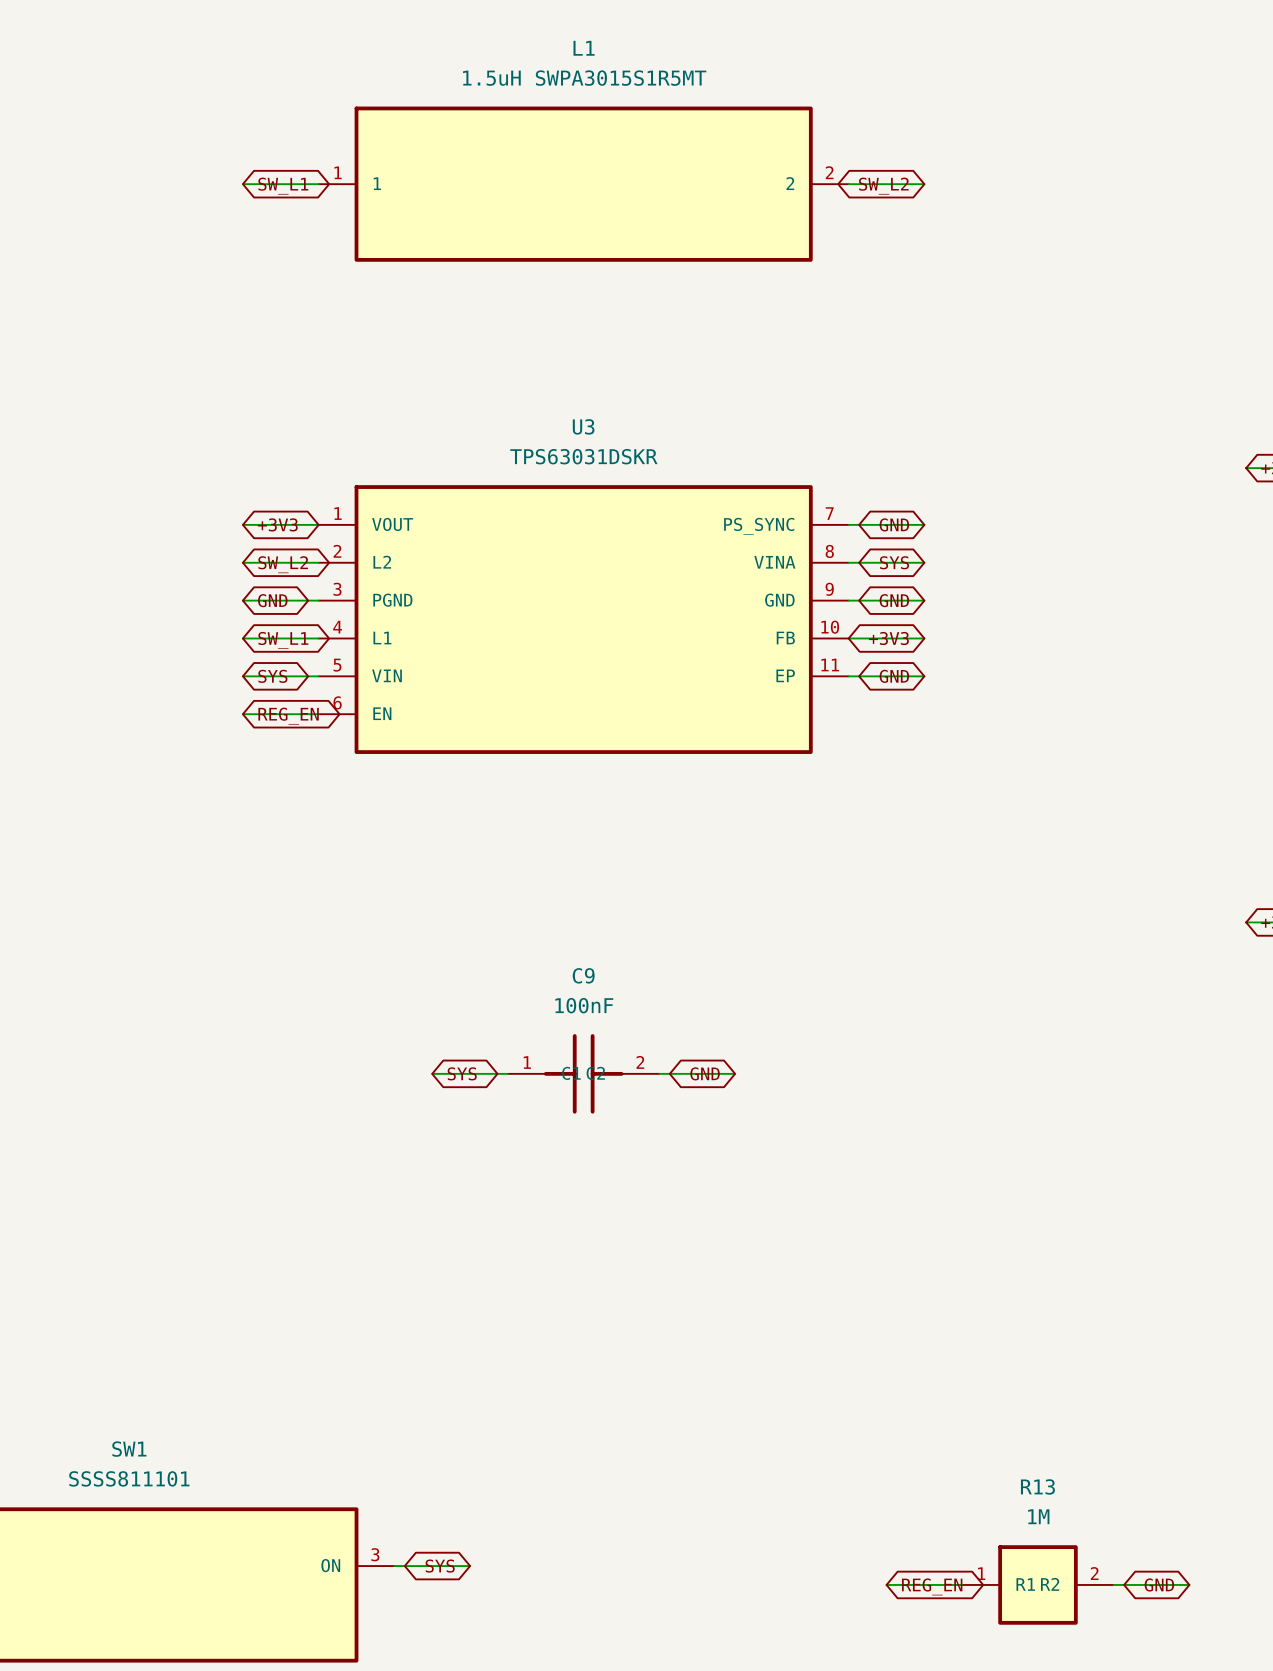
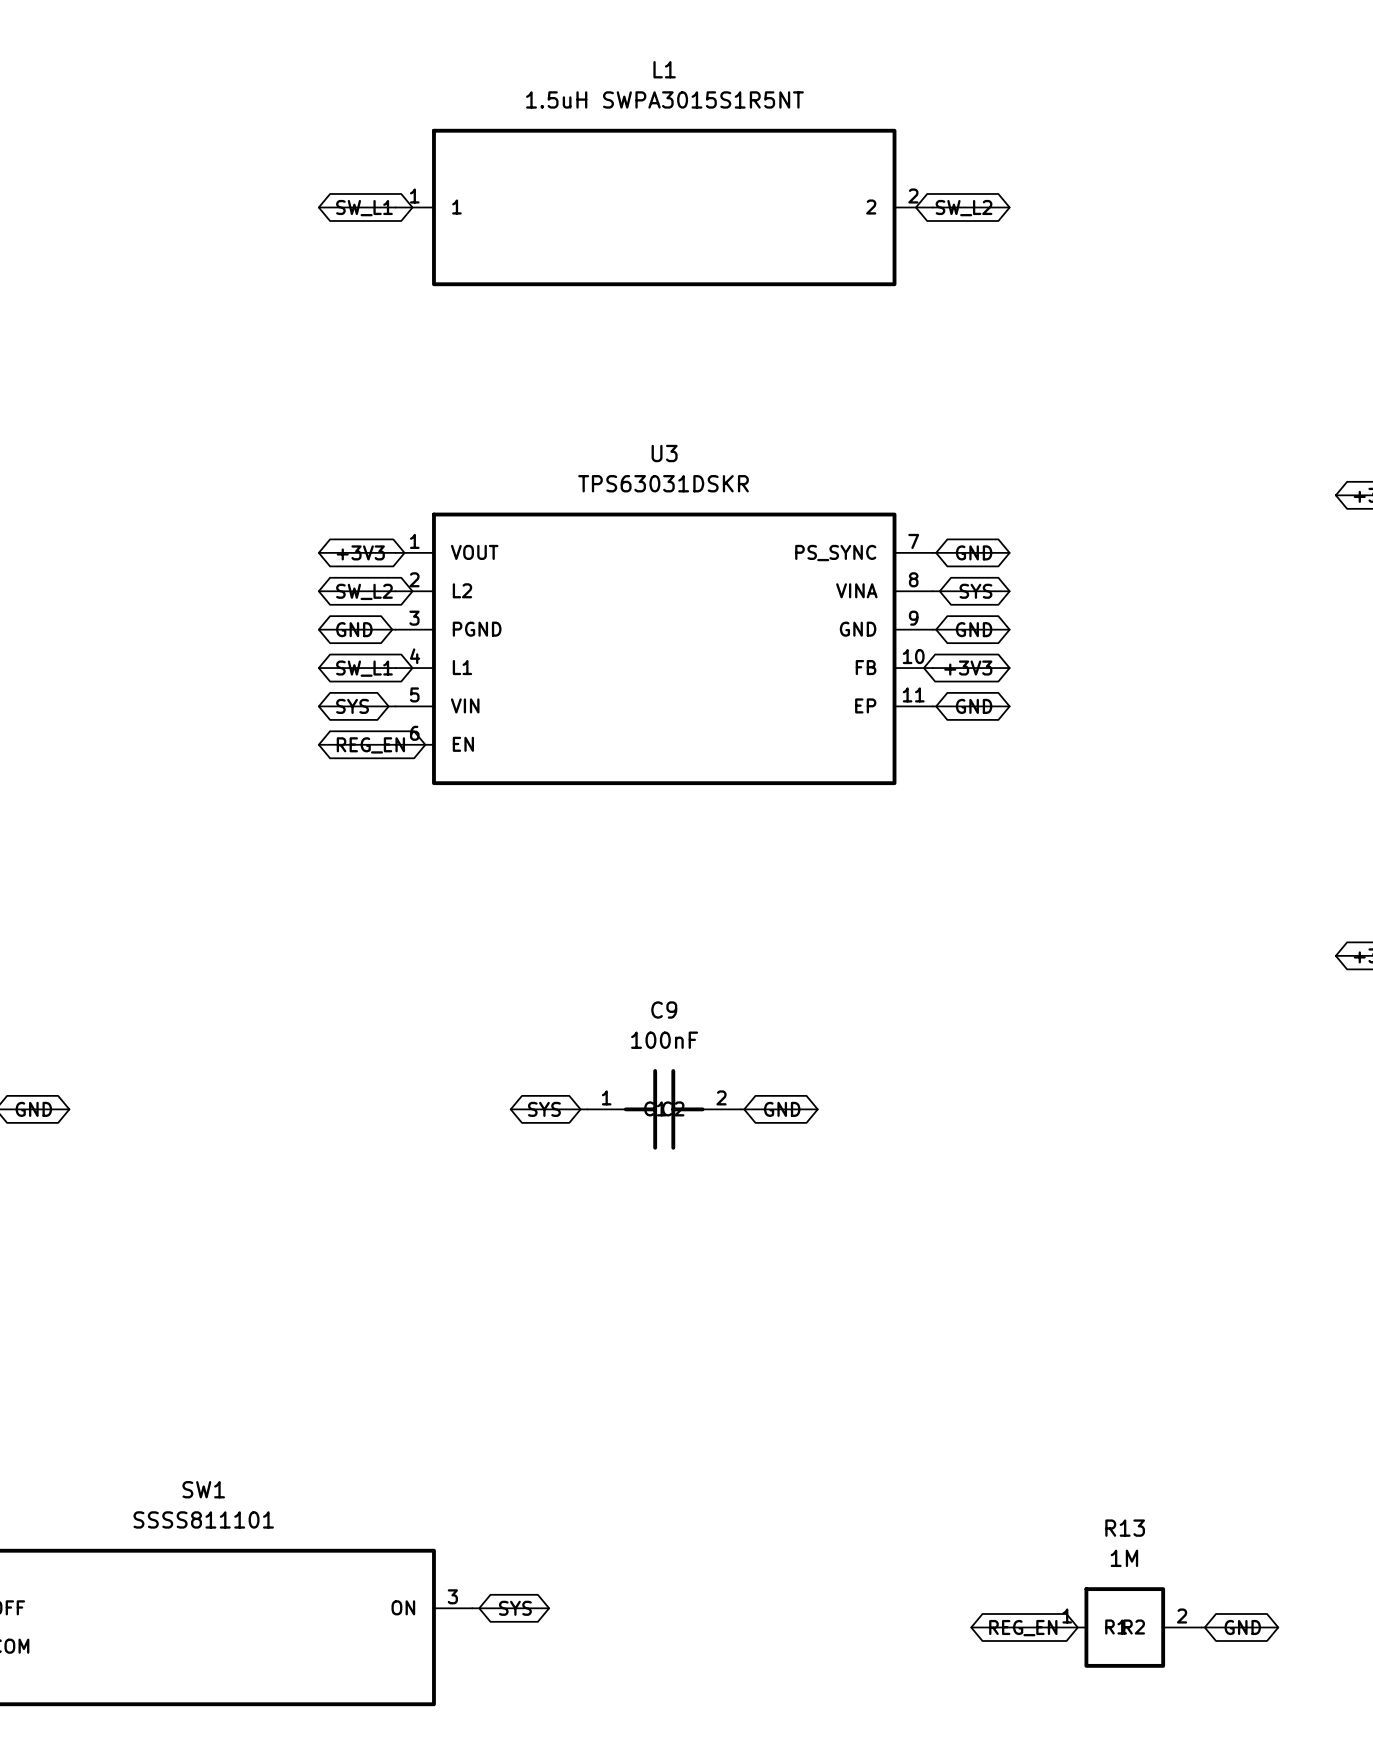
L1 value: 1.5uH SWPA3015S1R5MT (584, 78) -> 1.5uH SWPA3015S1R5NT (664, 99)

